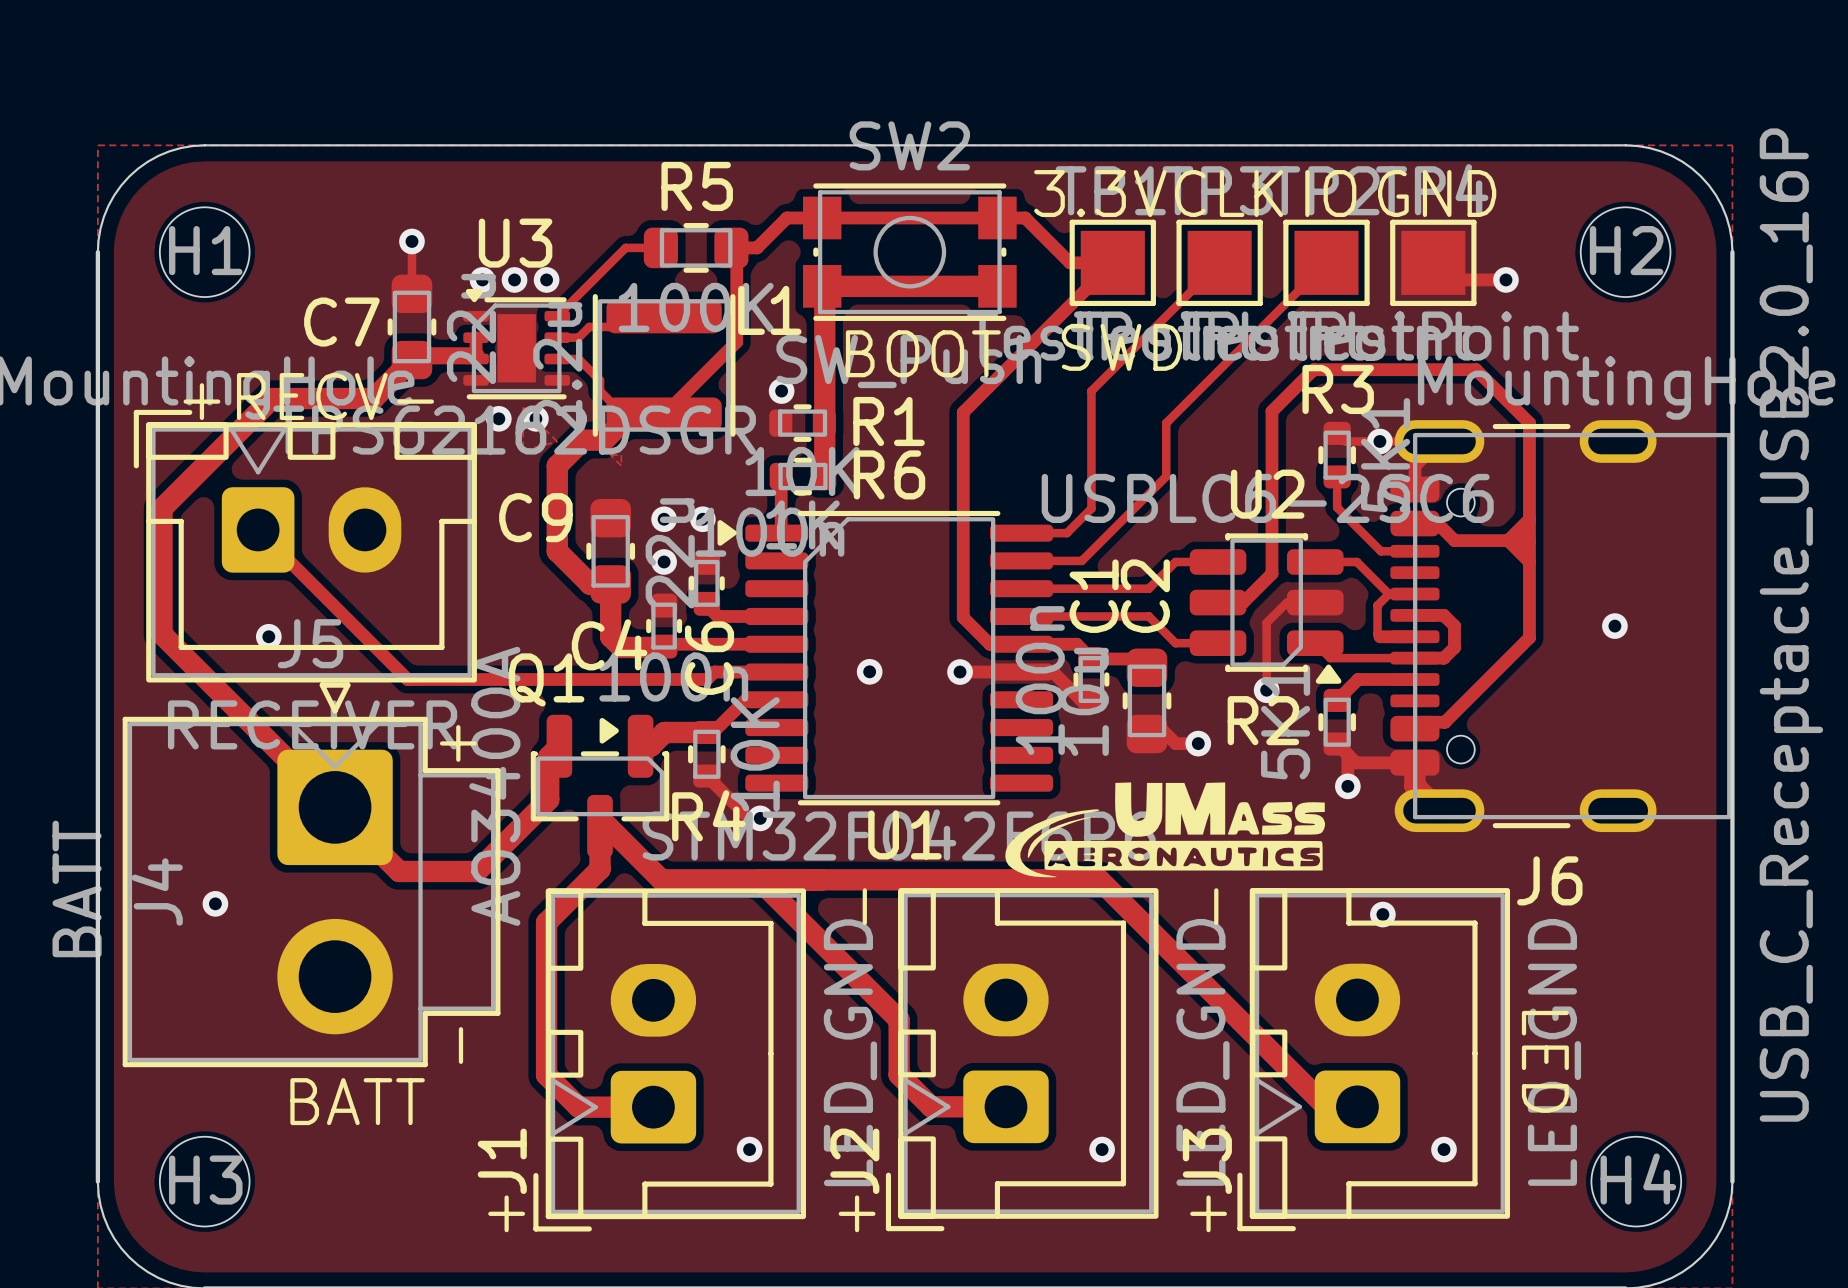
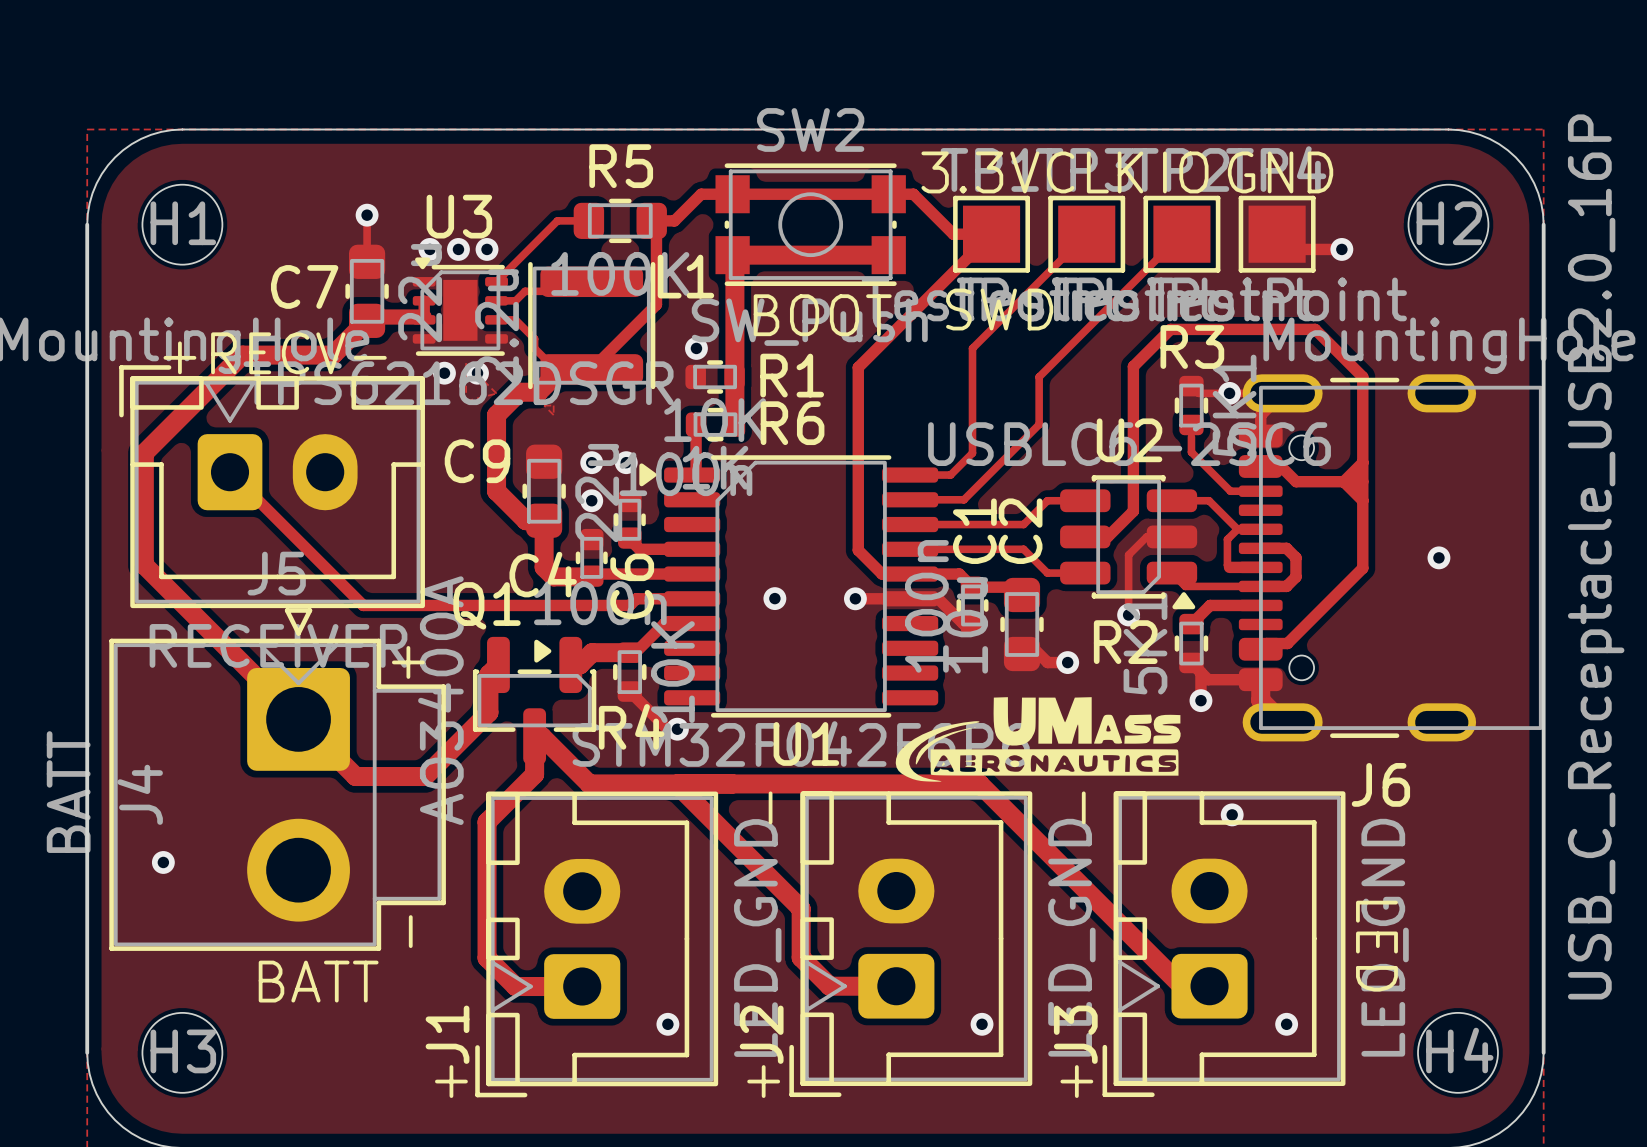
via: (268, 636) -> none
via position: (215, 903) -> (163, 862)

